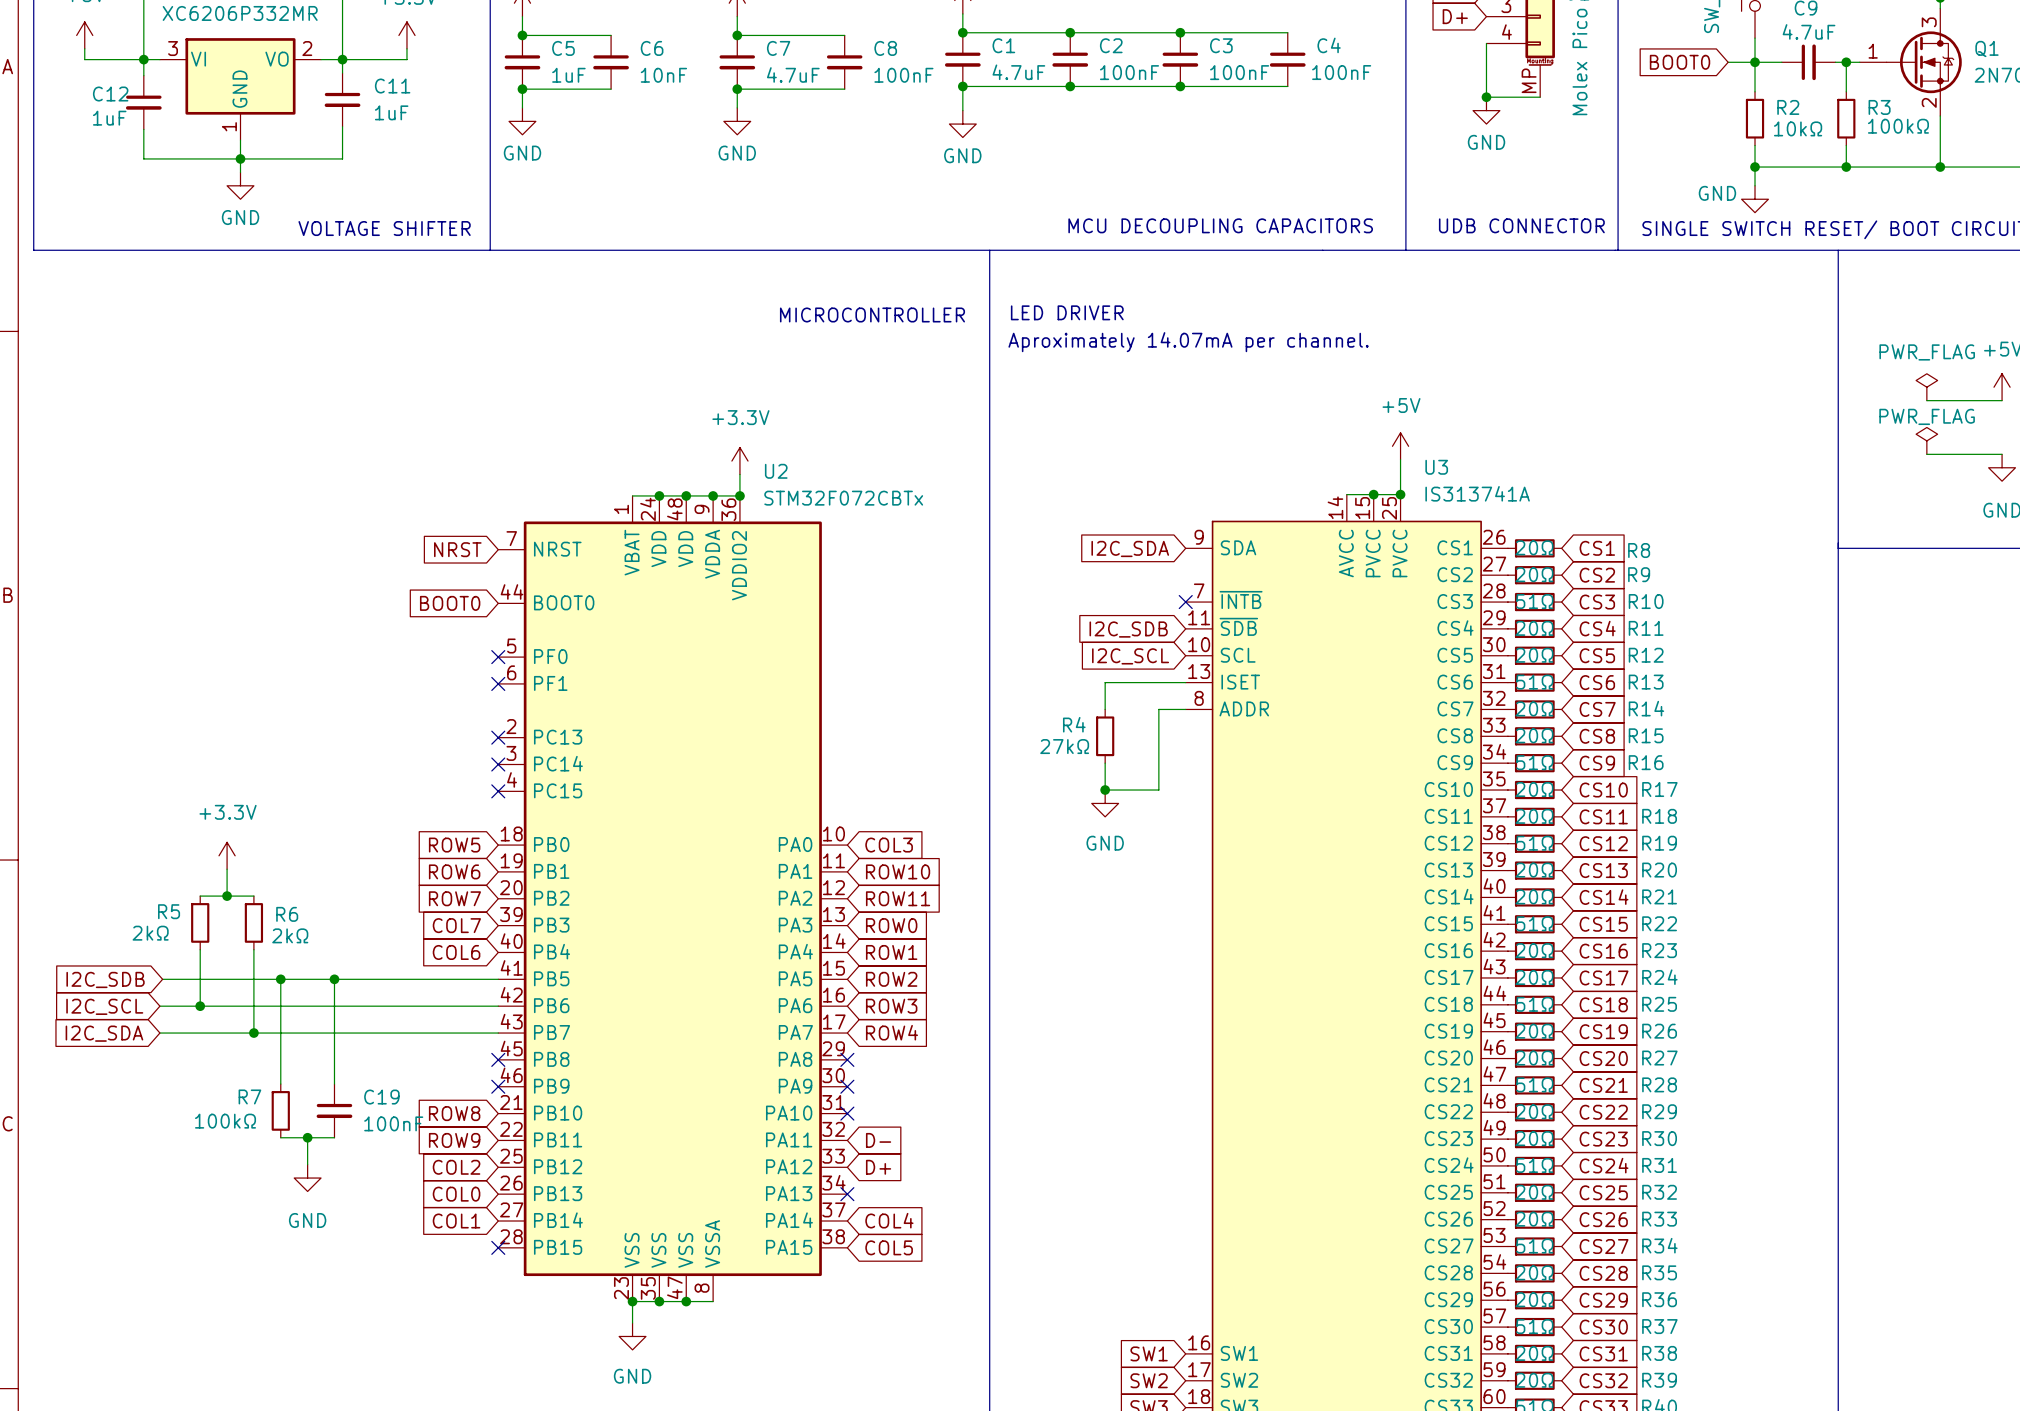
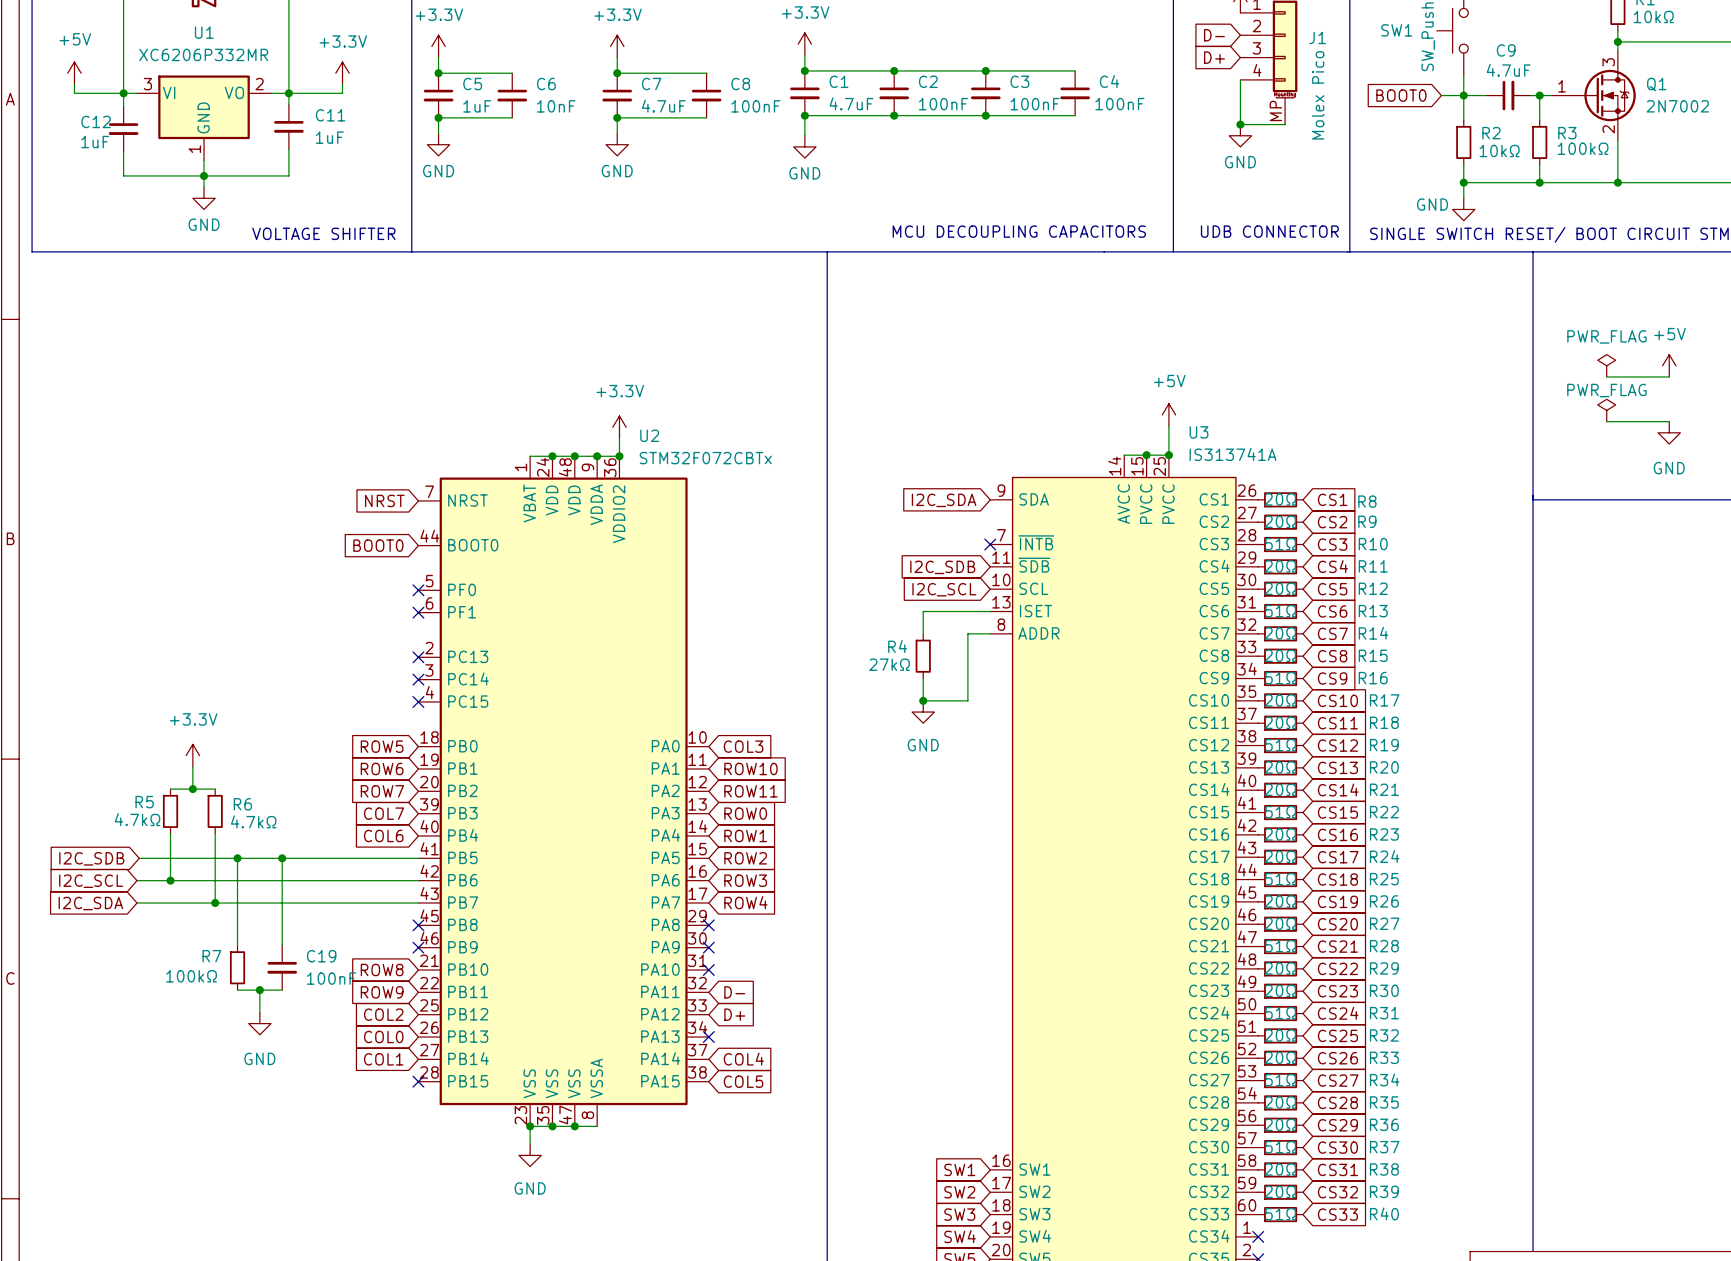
text: LED DRIVER (1067, 312) -> none
text: MICROCONTROLLER (872, 314) -> none
text: Aproximately 14.07mA per channel. (1188, 342) -> none
R5 value: 2kΩ (150, 933) -> 4.7kΩ (137, 819)
R6 value: 2kΩ (290, 935) -> 4.7kΩ (253, 821)

